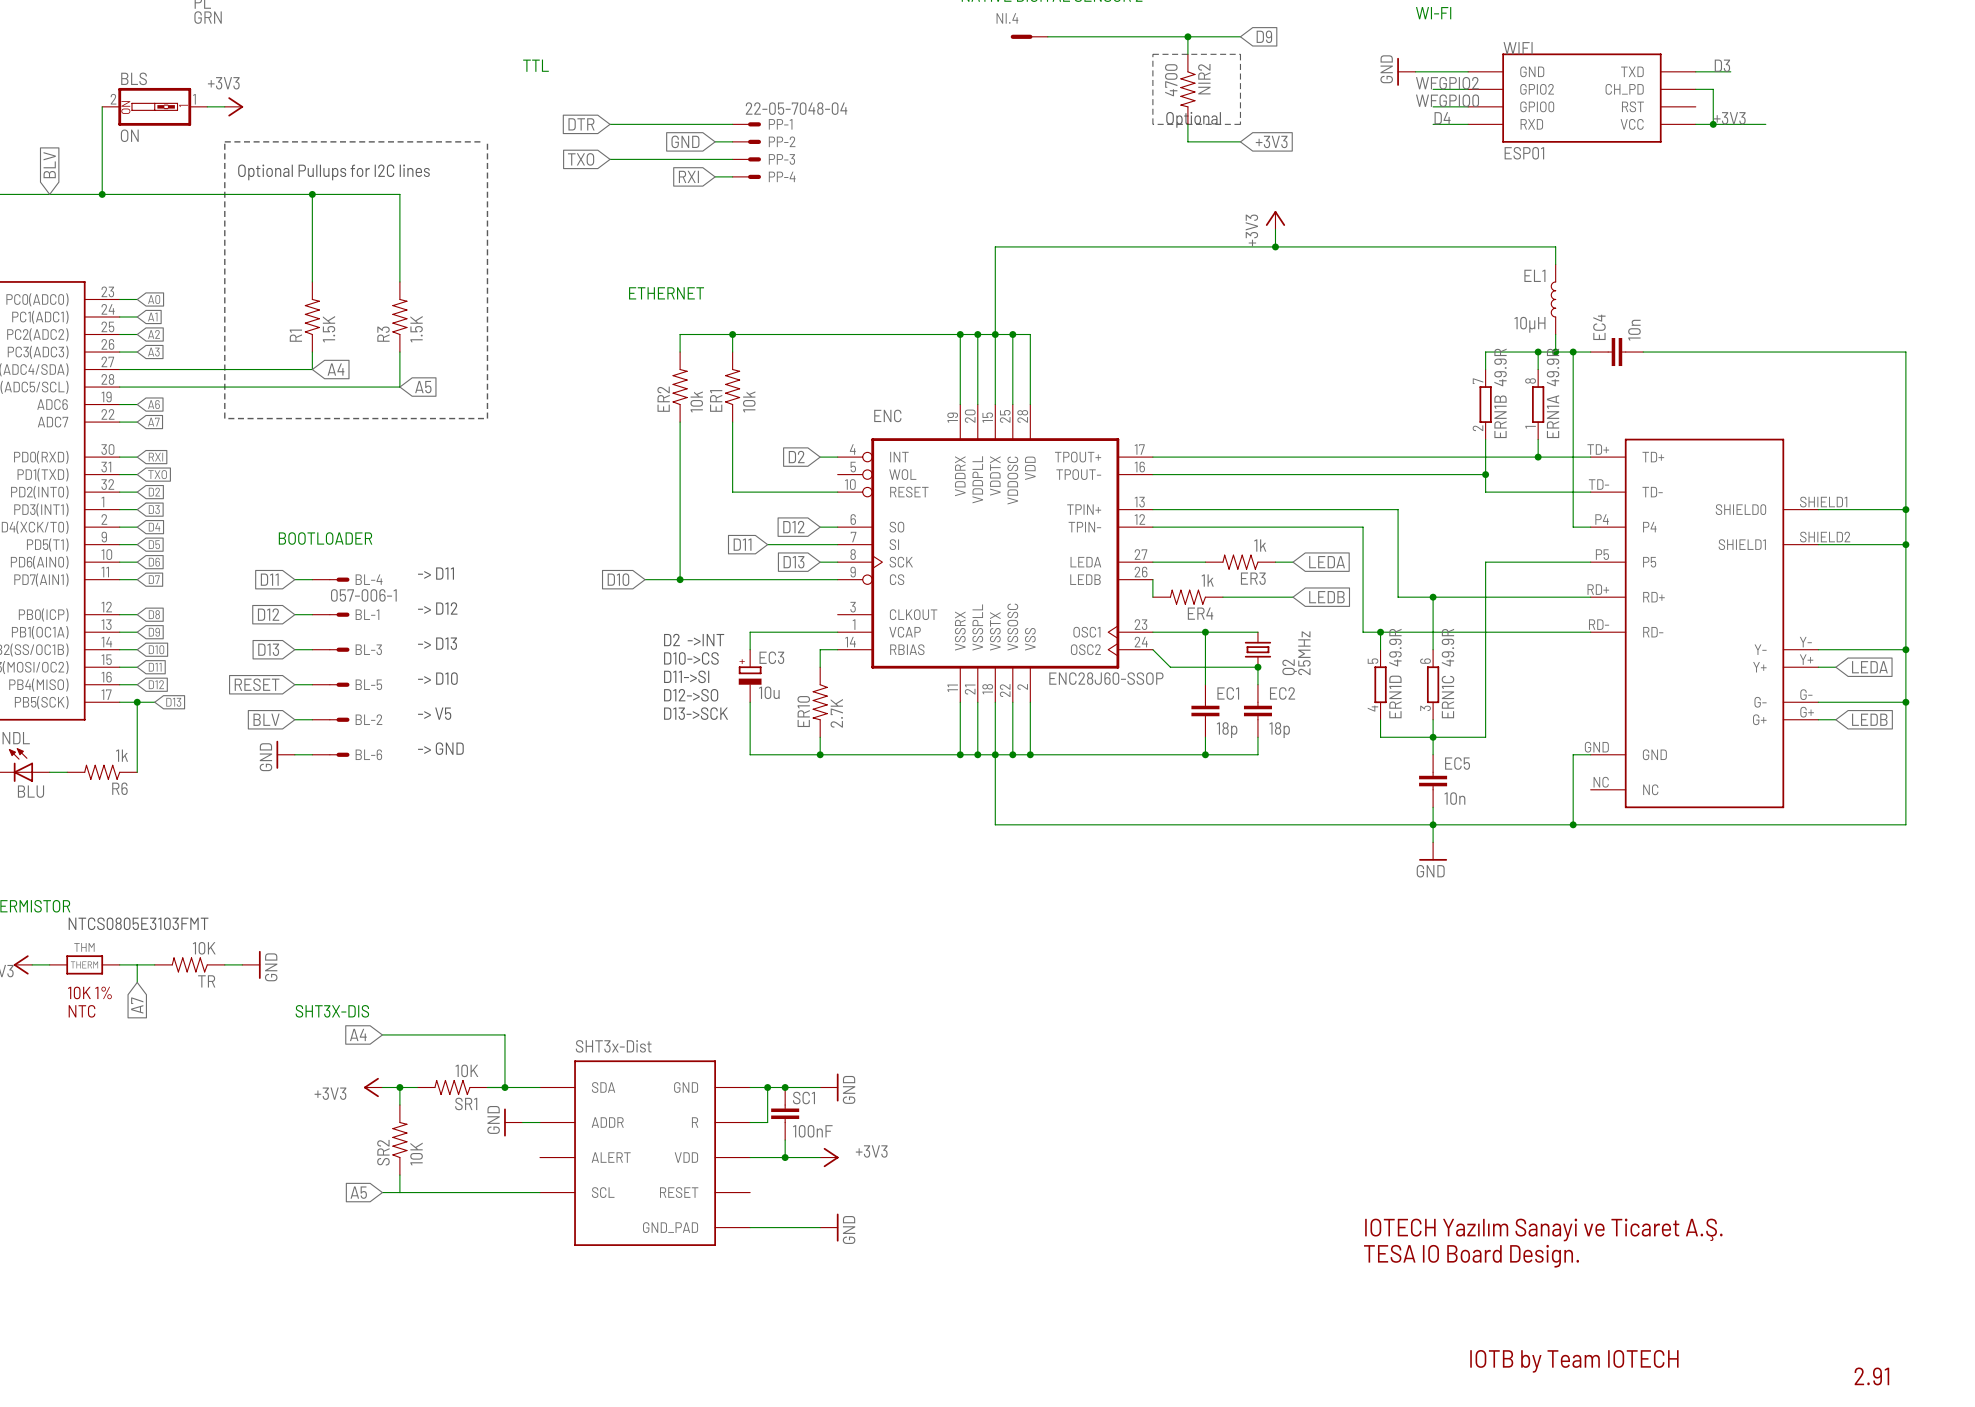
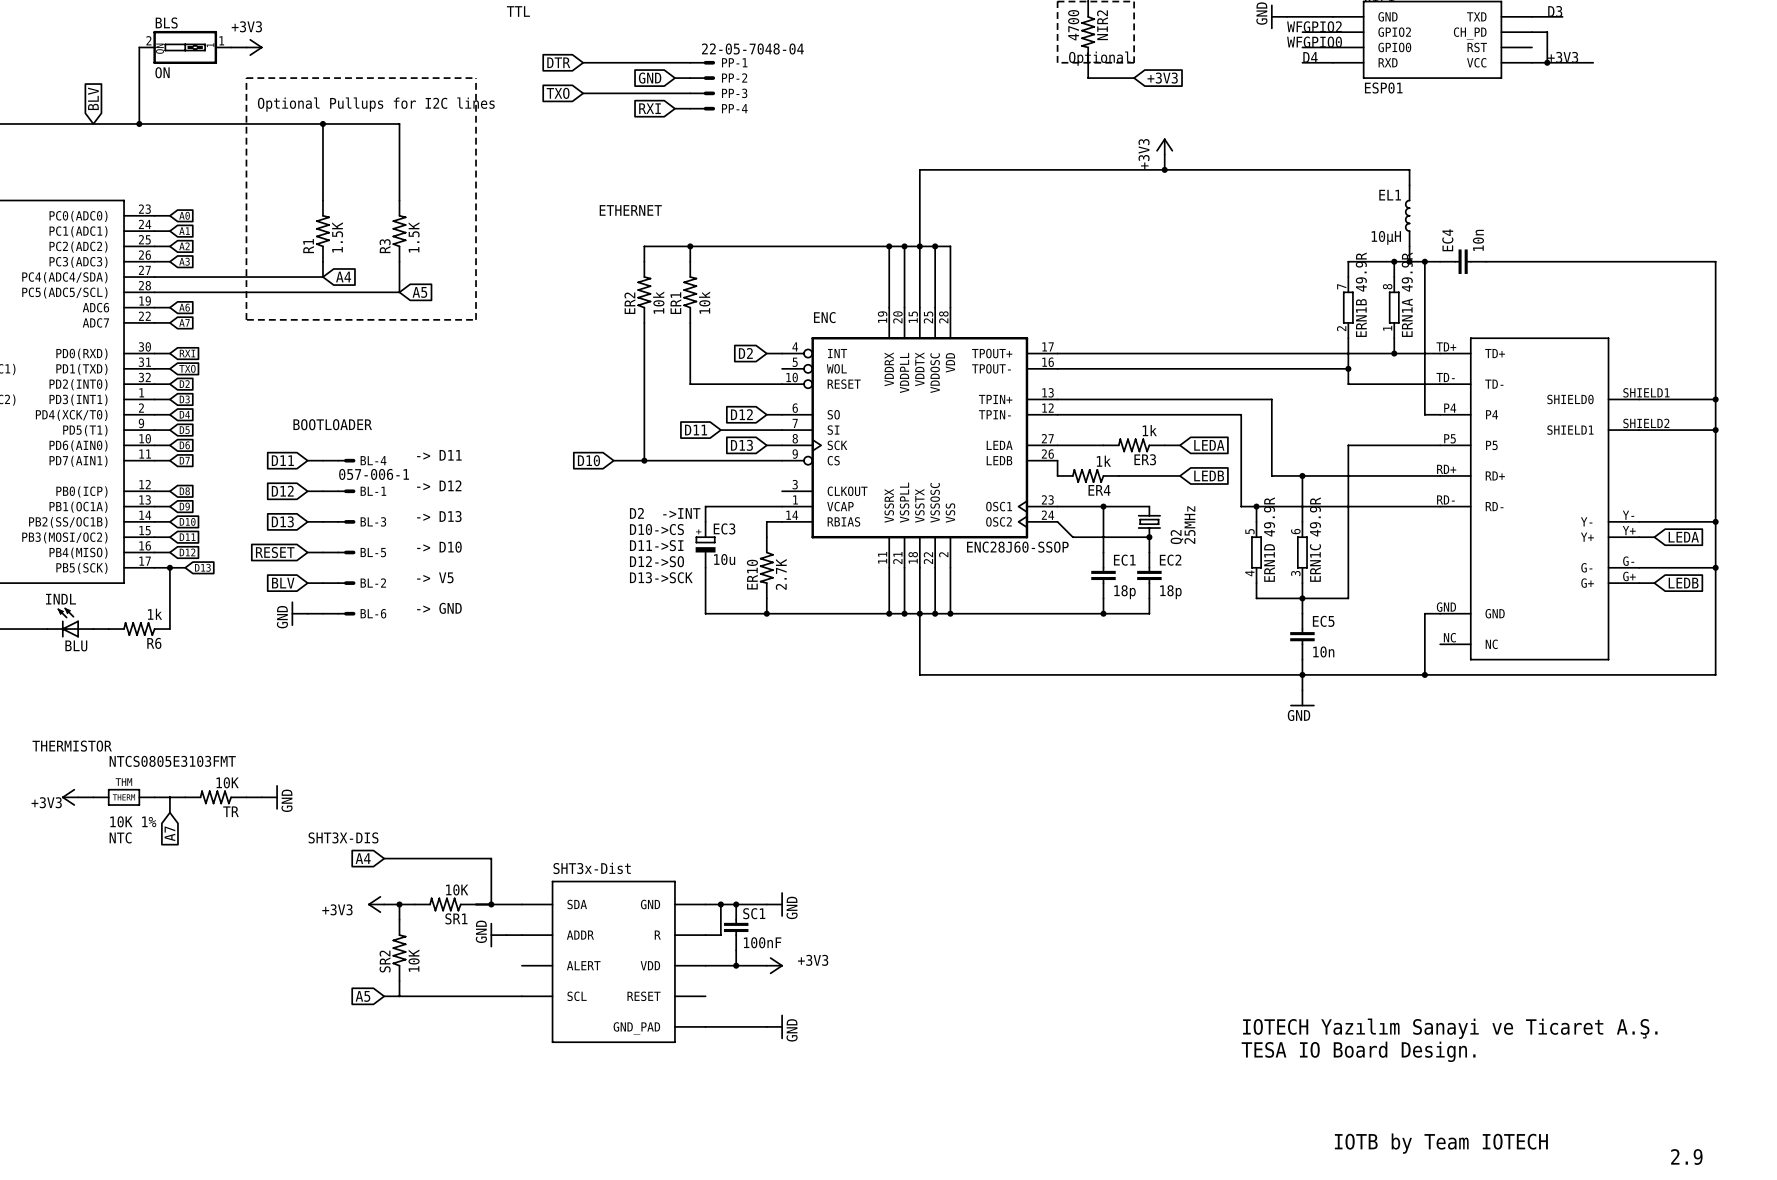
text: 2.91 (1871, 1376) -> 2.9 (1686, 1157)

